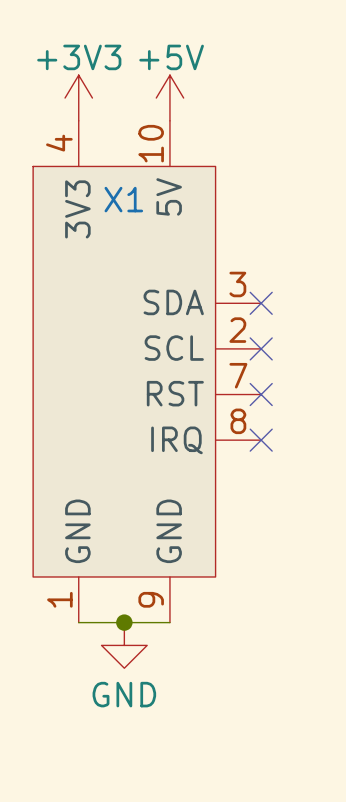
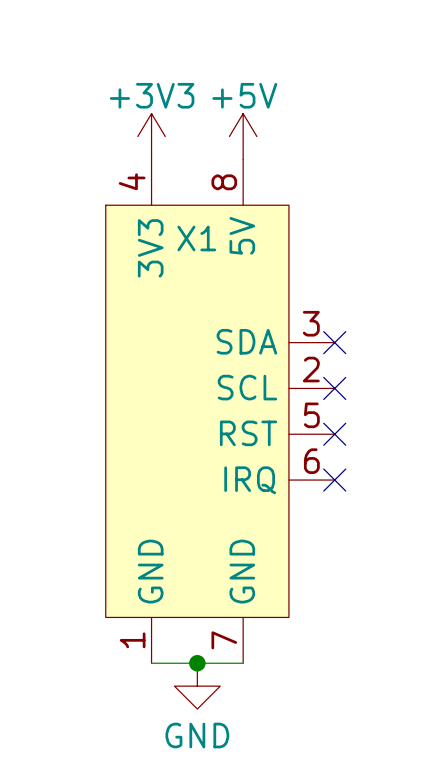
X1 pin number: 10 (151, 143) -> 8 (224, 182)
X1 pin number: 7 (238, 375) -> 5 (311, 415)
X1 pin number: 8 (238, 421) -> 6 (311, 461)
X1 pin number: 9 (151, 599) -> 7 (224, 640)

